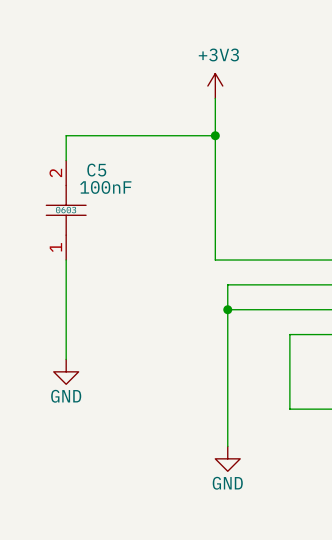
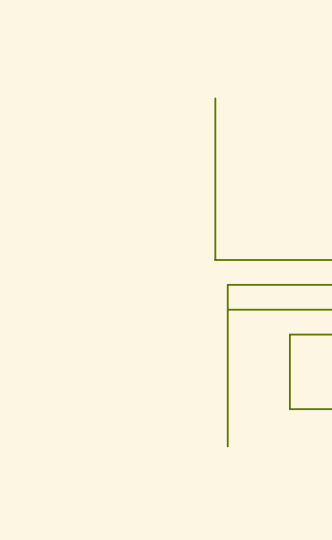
power symbol: +3V3 (215, 86) -> none
wire: (215, 135) (66, 135) (66, 160) -> none
junction: (215, 135) -> none
C5: (66, 210) -> none
wire: (66, 260) (66, 359) -> none
junction: (227, 309) -> none
power symbol: GND (66, 371) -> none
power symbol: GND (227, 458) -> none

